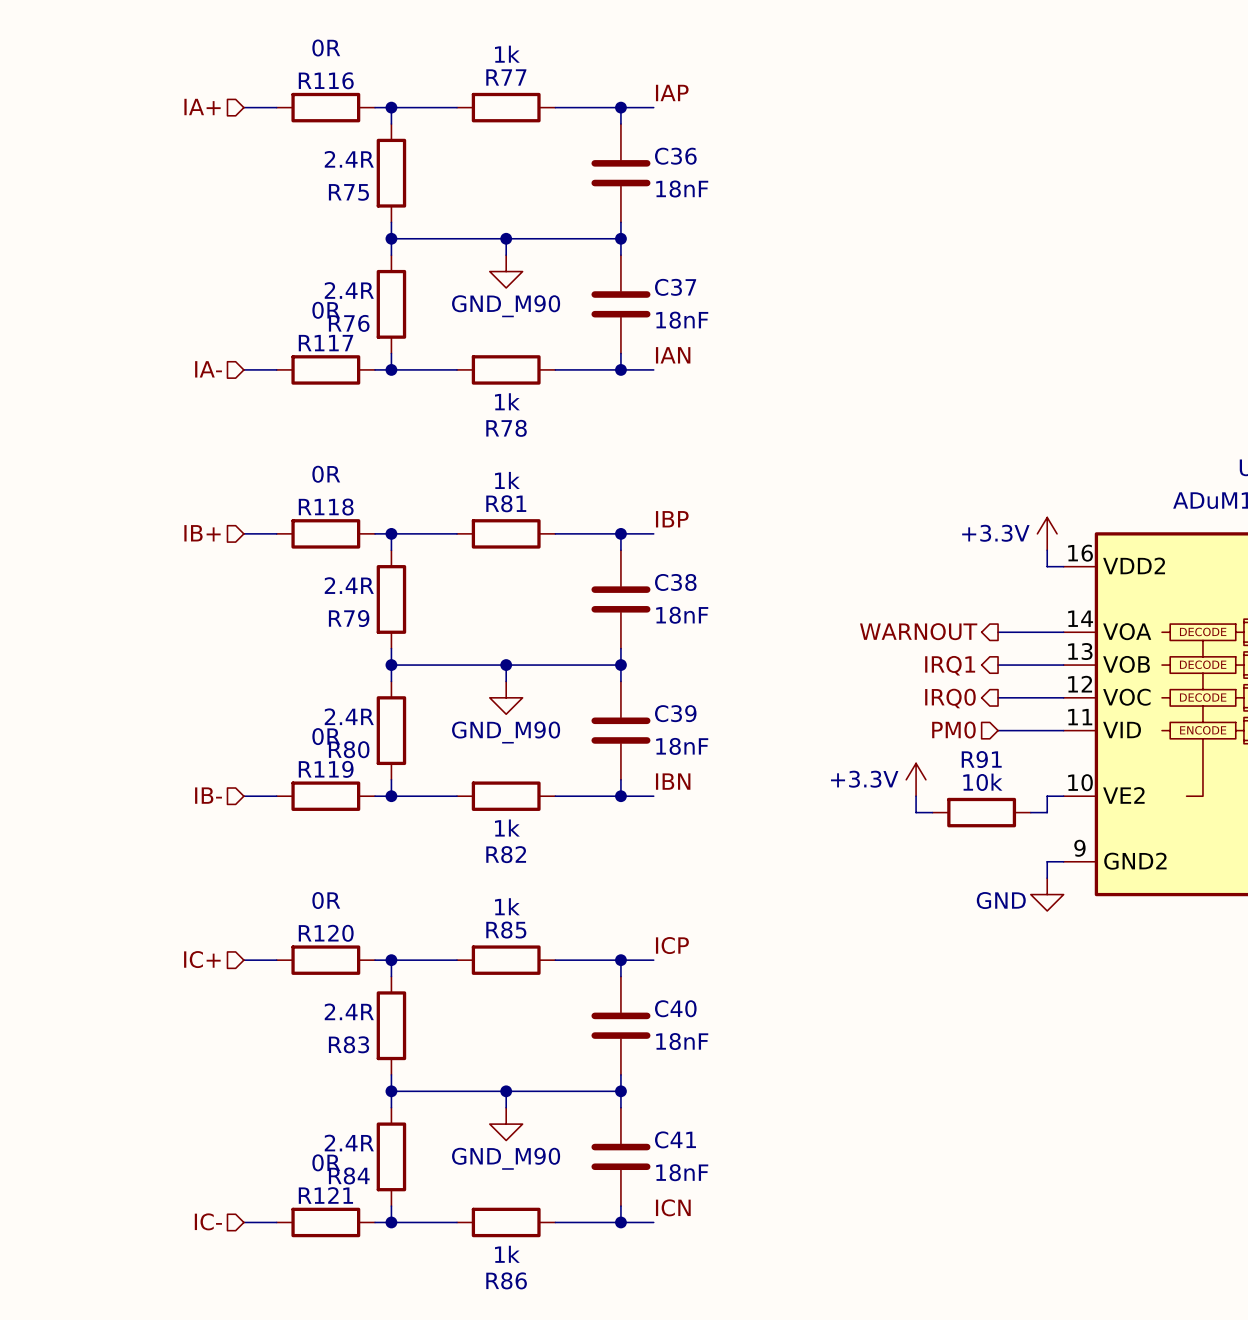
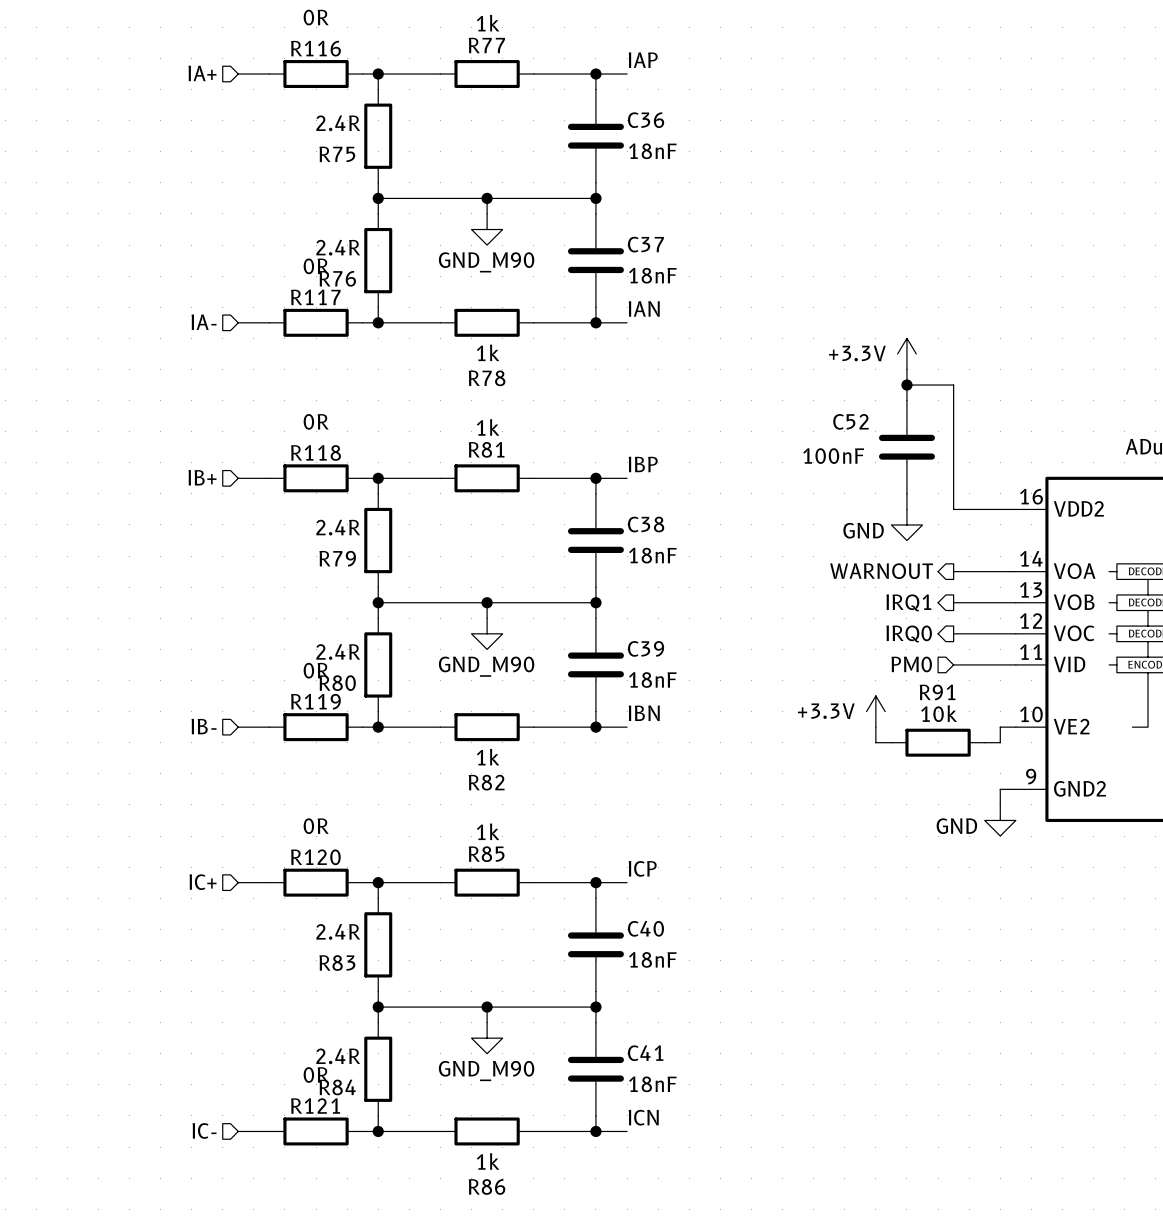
wire: none -> (906, 369) (906, 400)
junction: none -> (906, 385)
C52: none -> 100nF (906, 447)
power symbol position: +3.3V (1047, 533) -> +3.3V (906, 353)
wire: none -> (906, 493) (906, 509)
wire: (1047, 550) (1047, 566) -> (906, 385) (953, 385) (953, 509) (1000, 509)
power symbol: none -> GND (906, 524)

